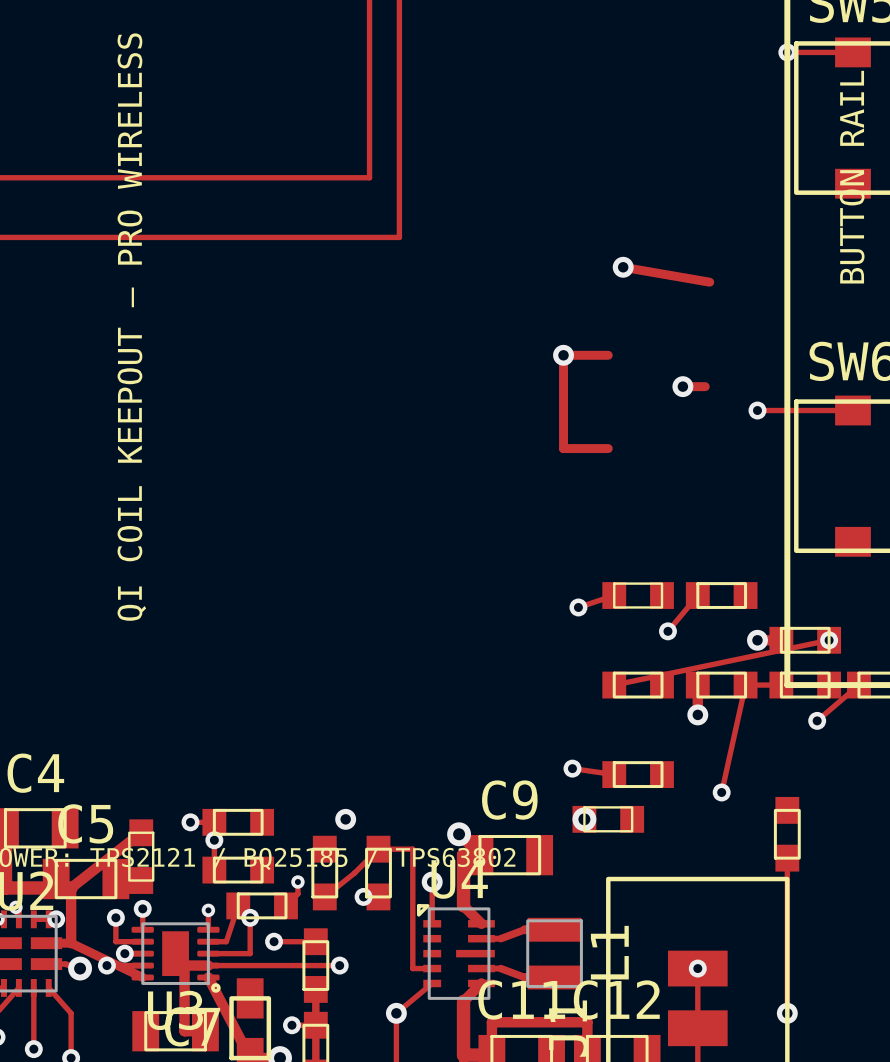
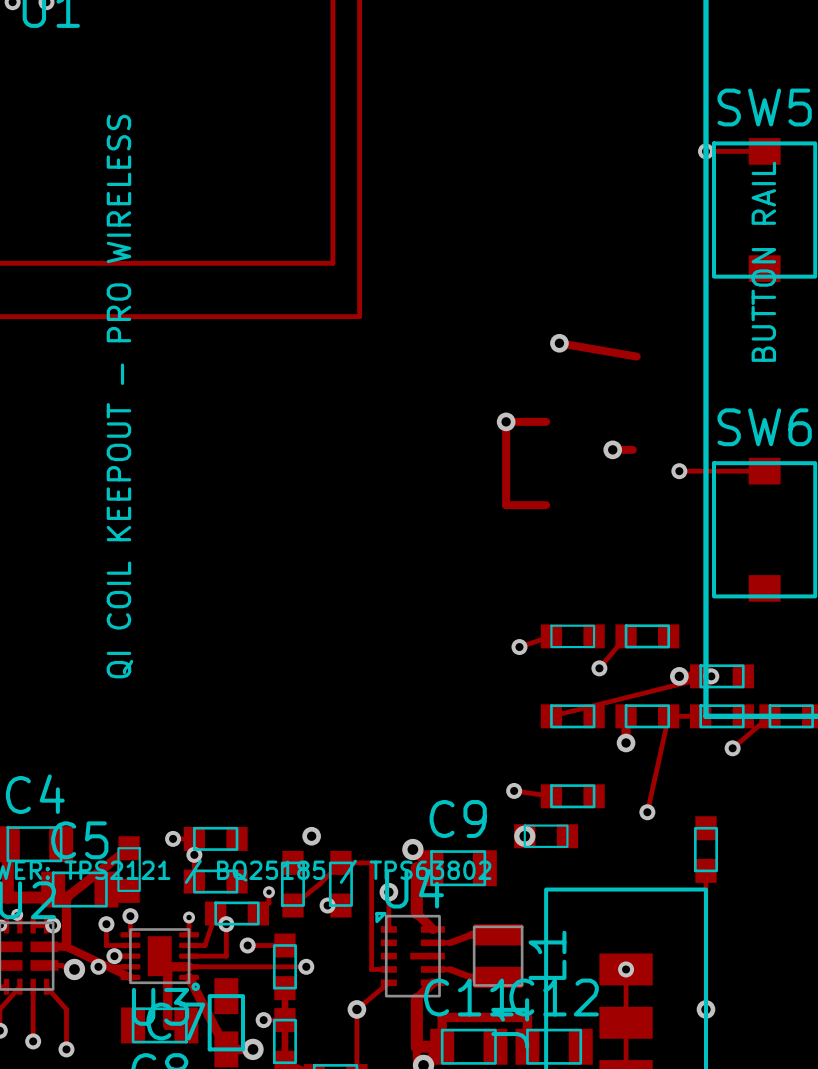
track: (829, 640) (614, 685) -> (711, 676) (551, 716)
via position: (829, 640) -> (711, 676)

